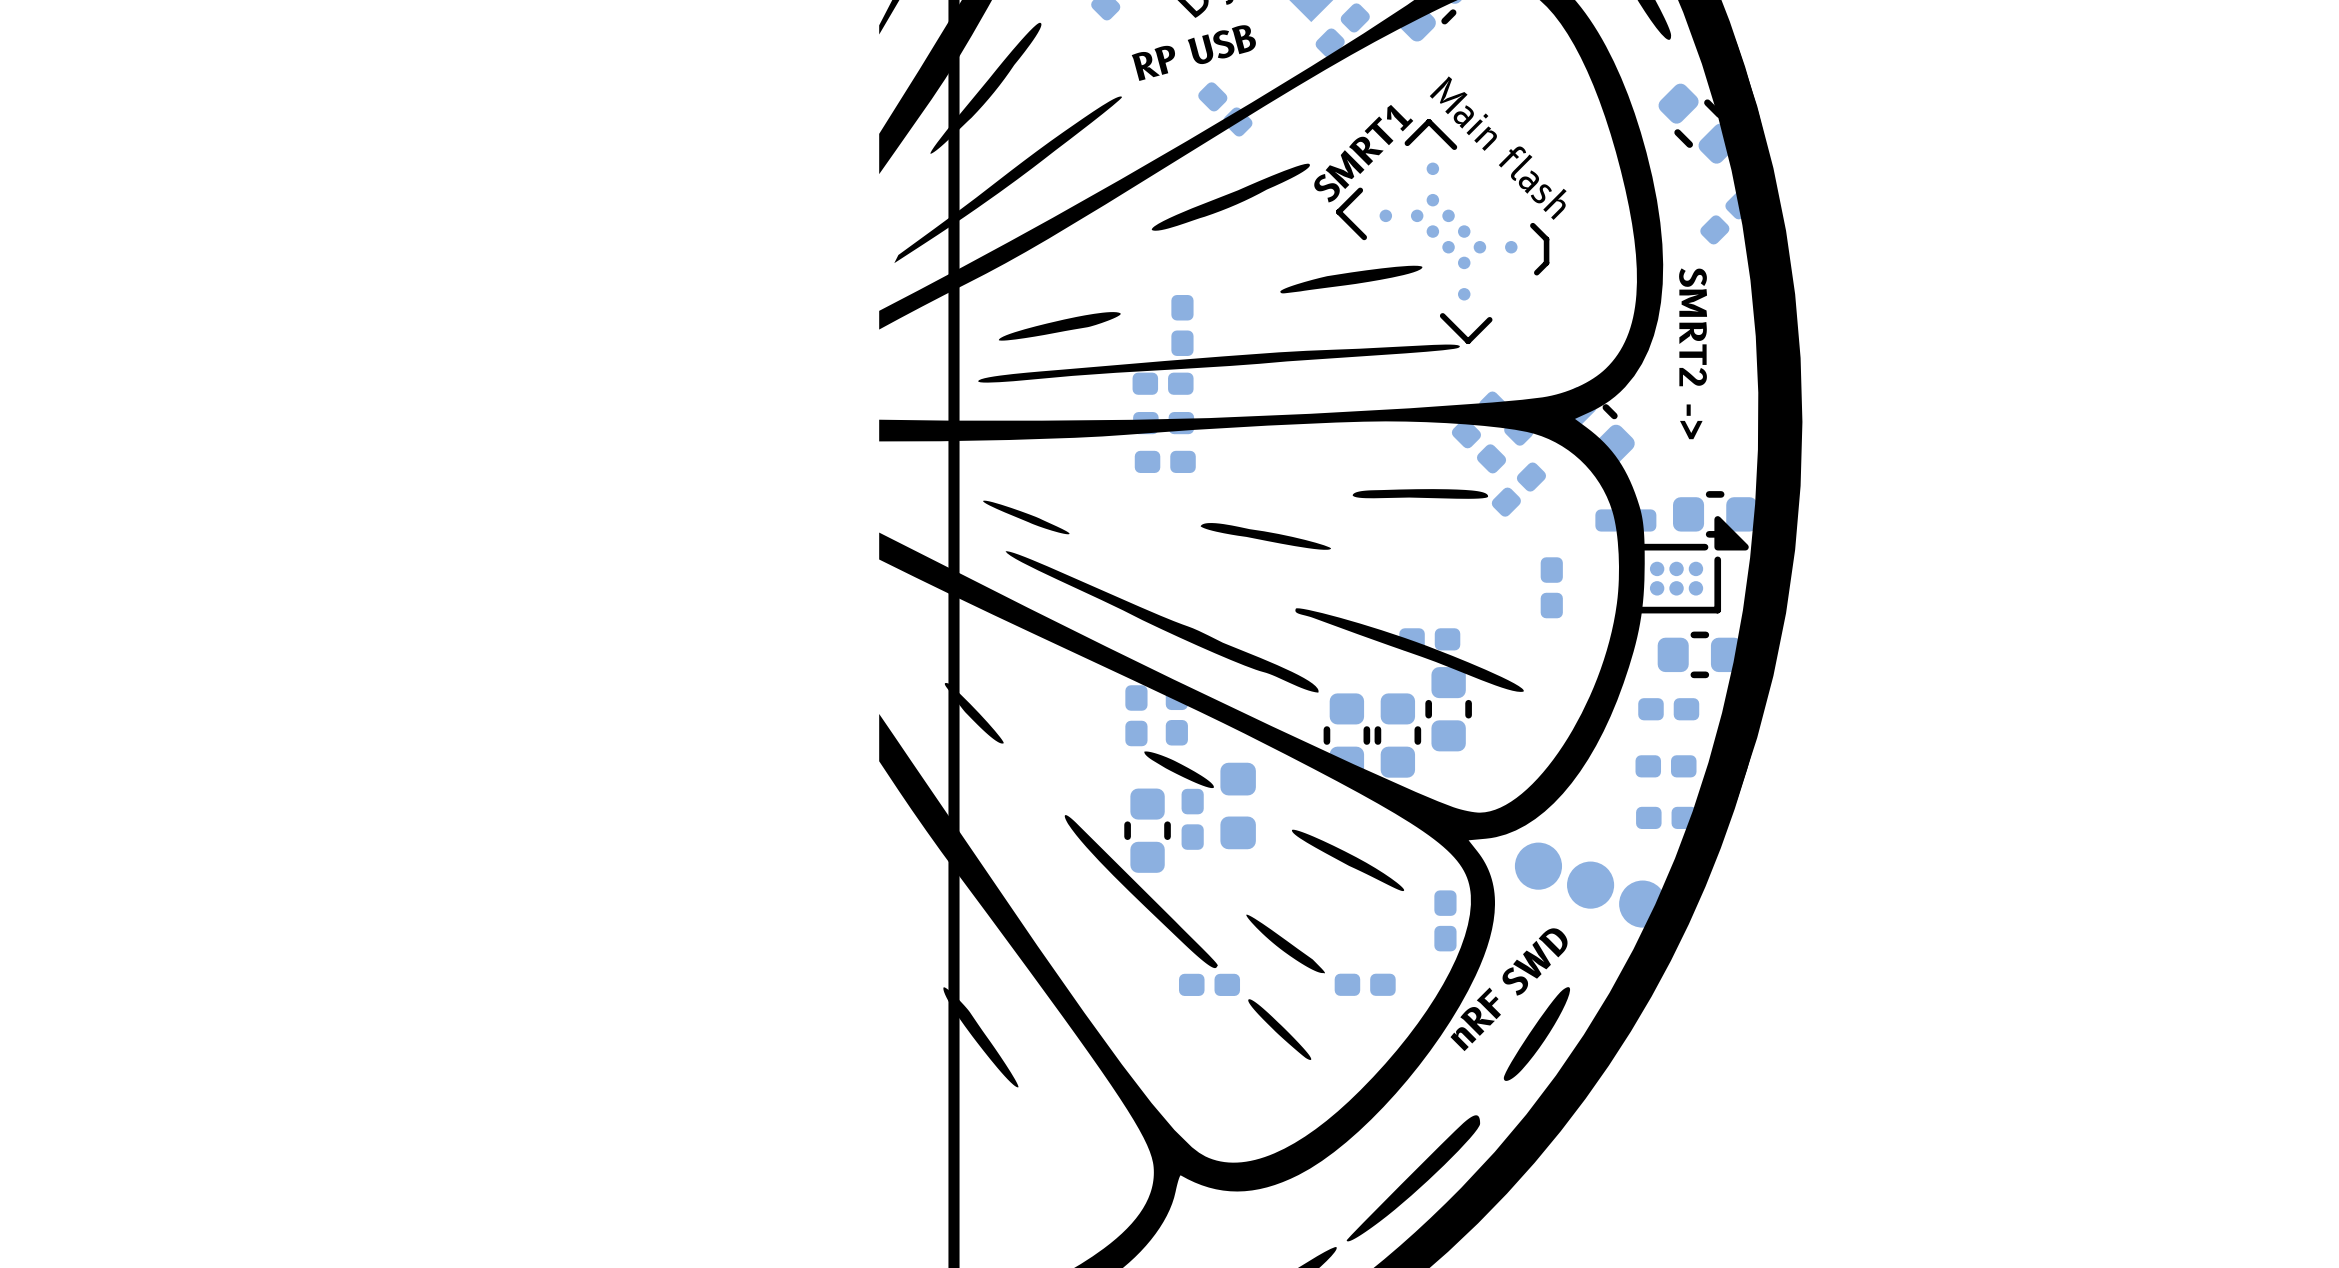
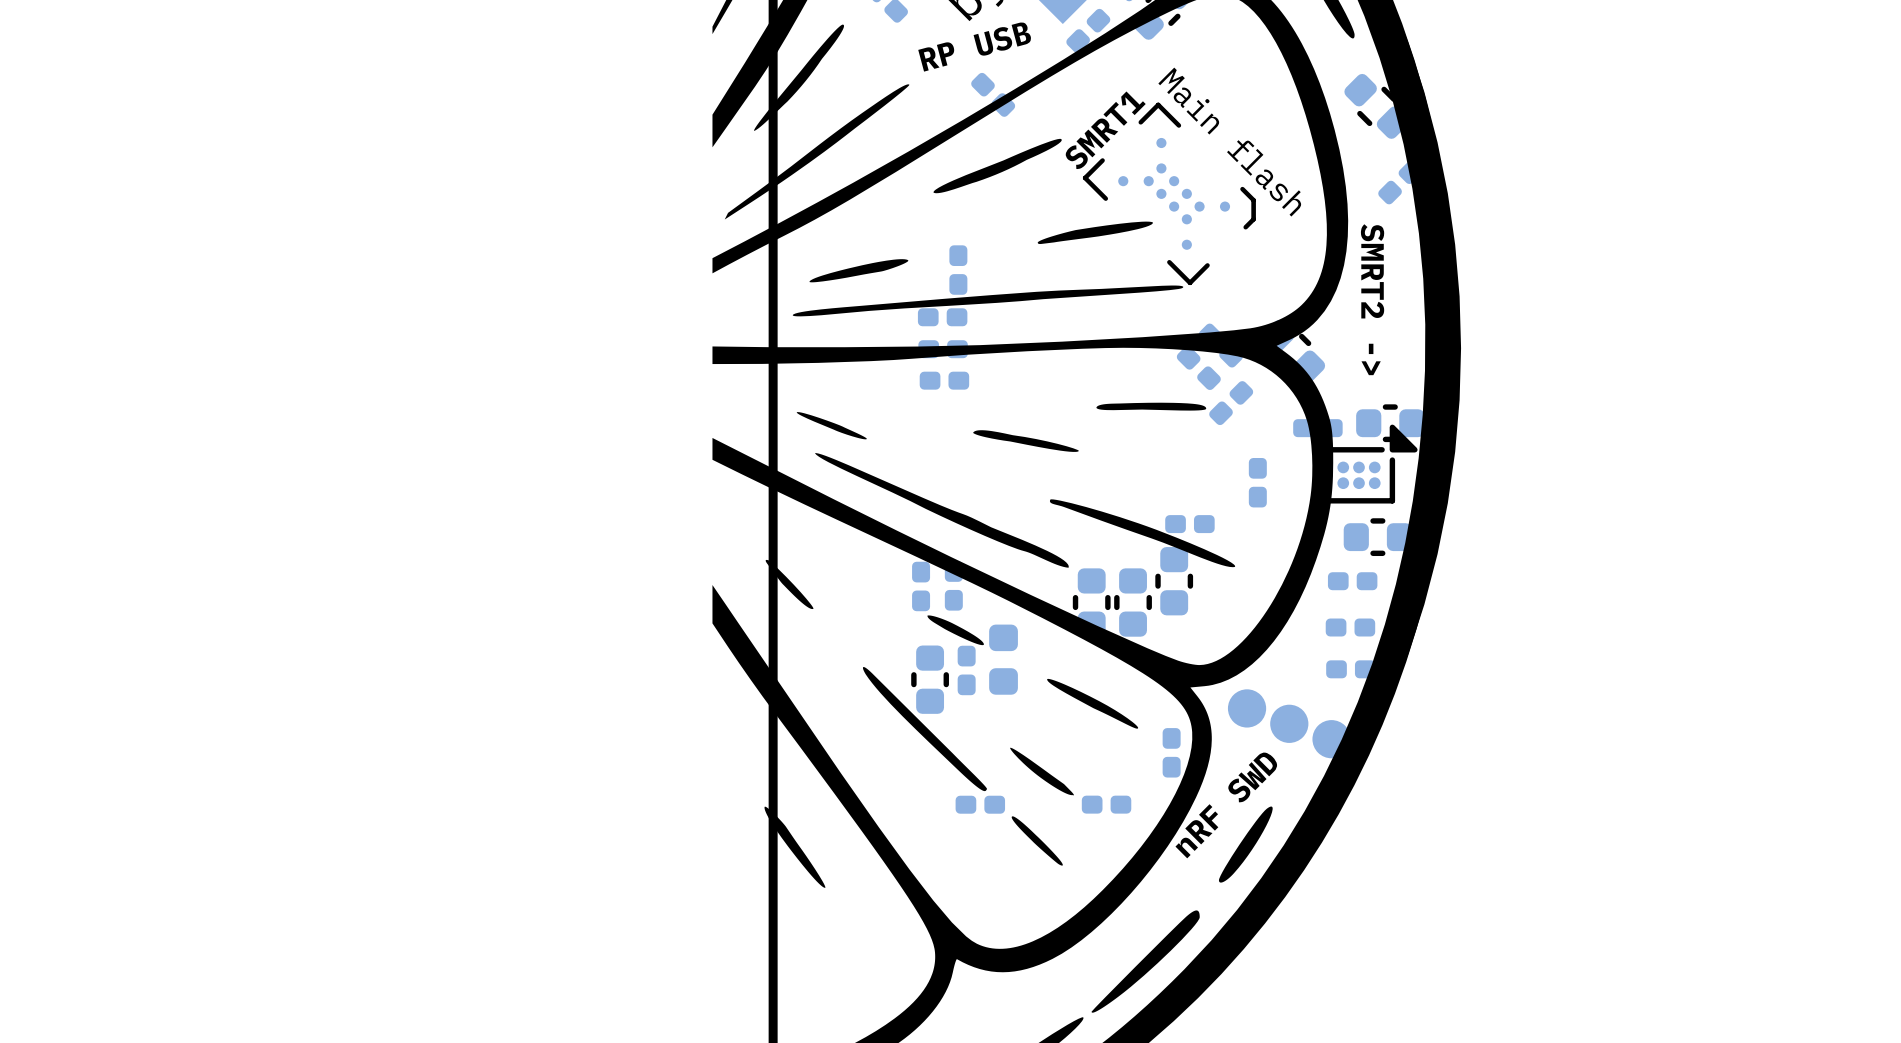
part position: (1429, 639) -> (1189, 524)

